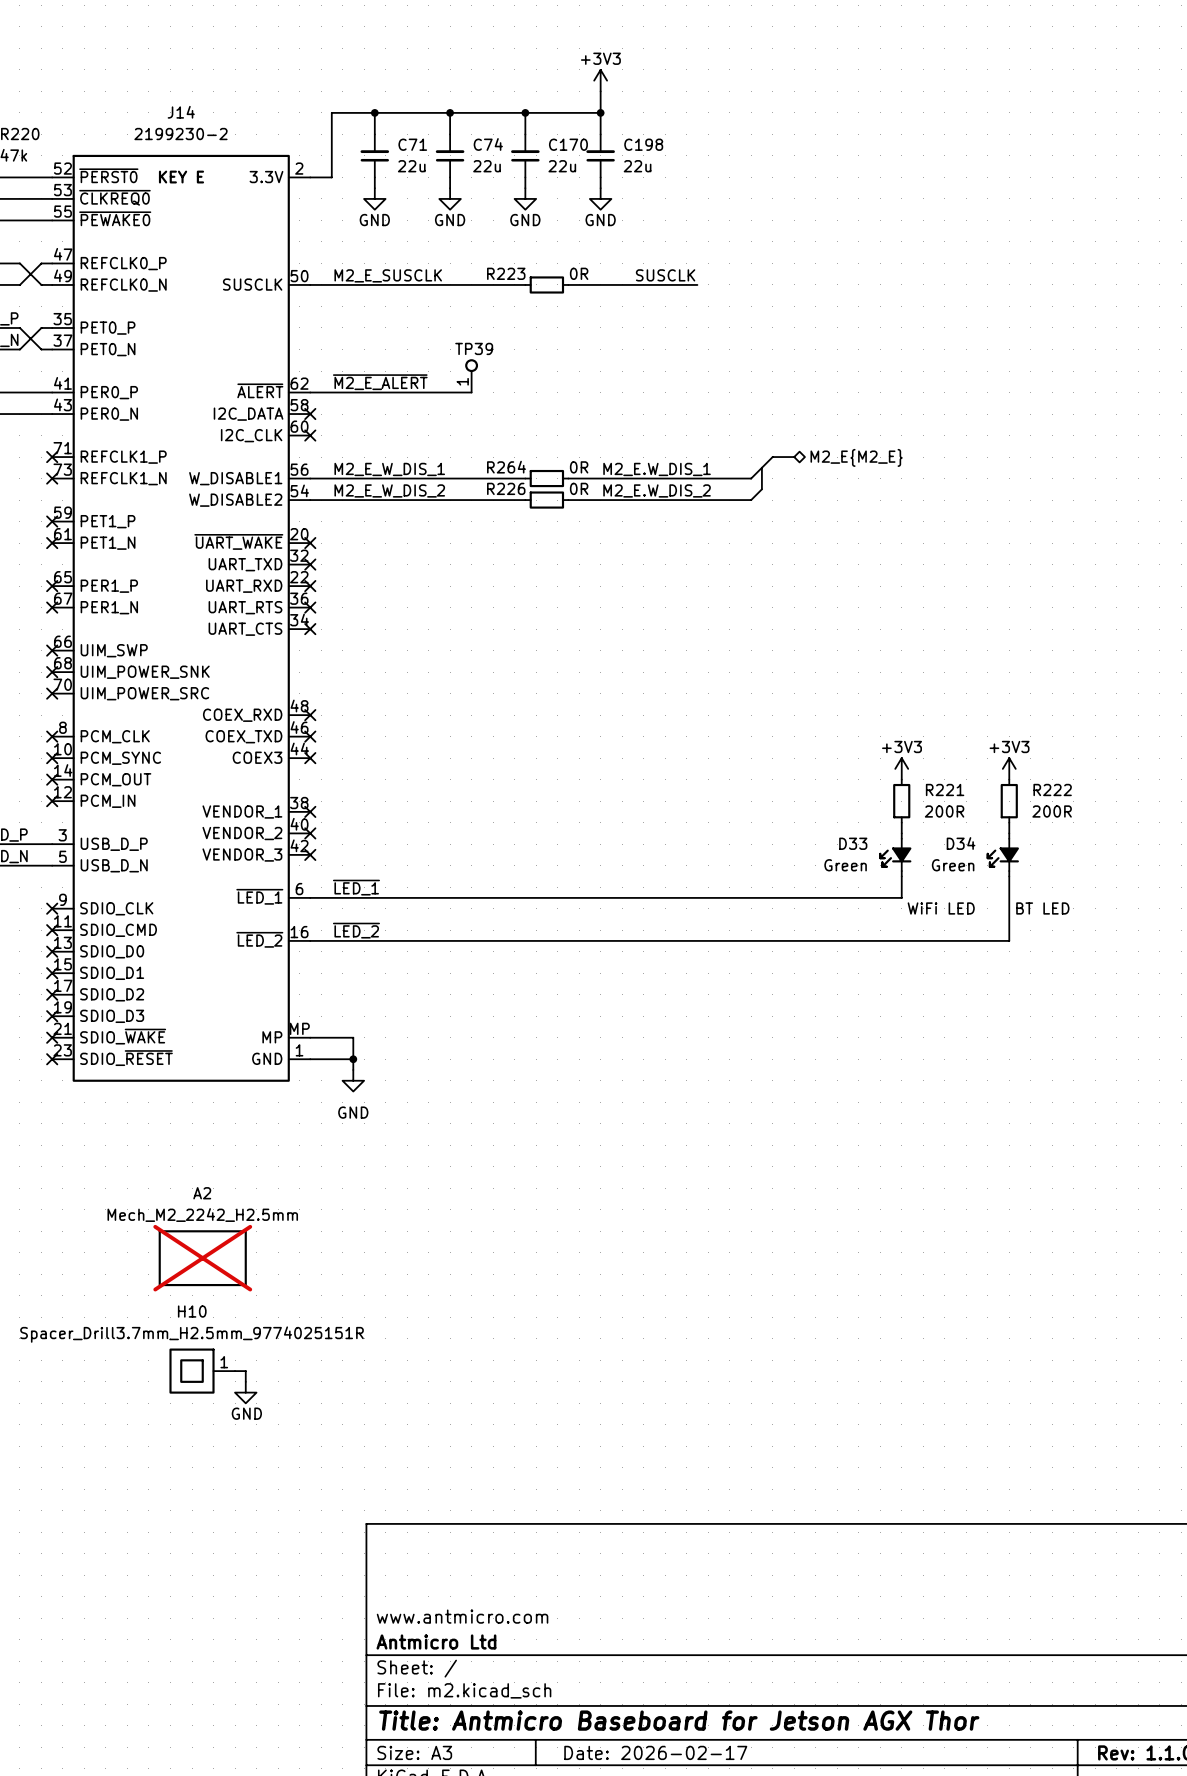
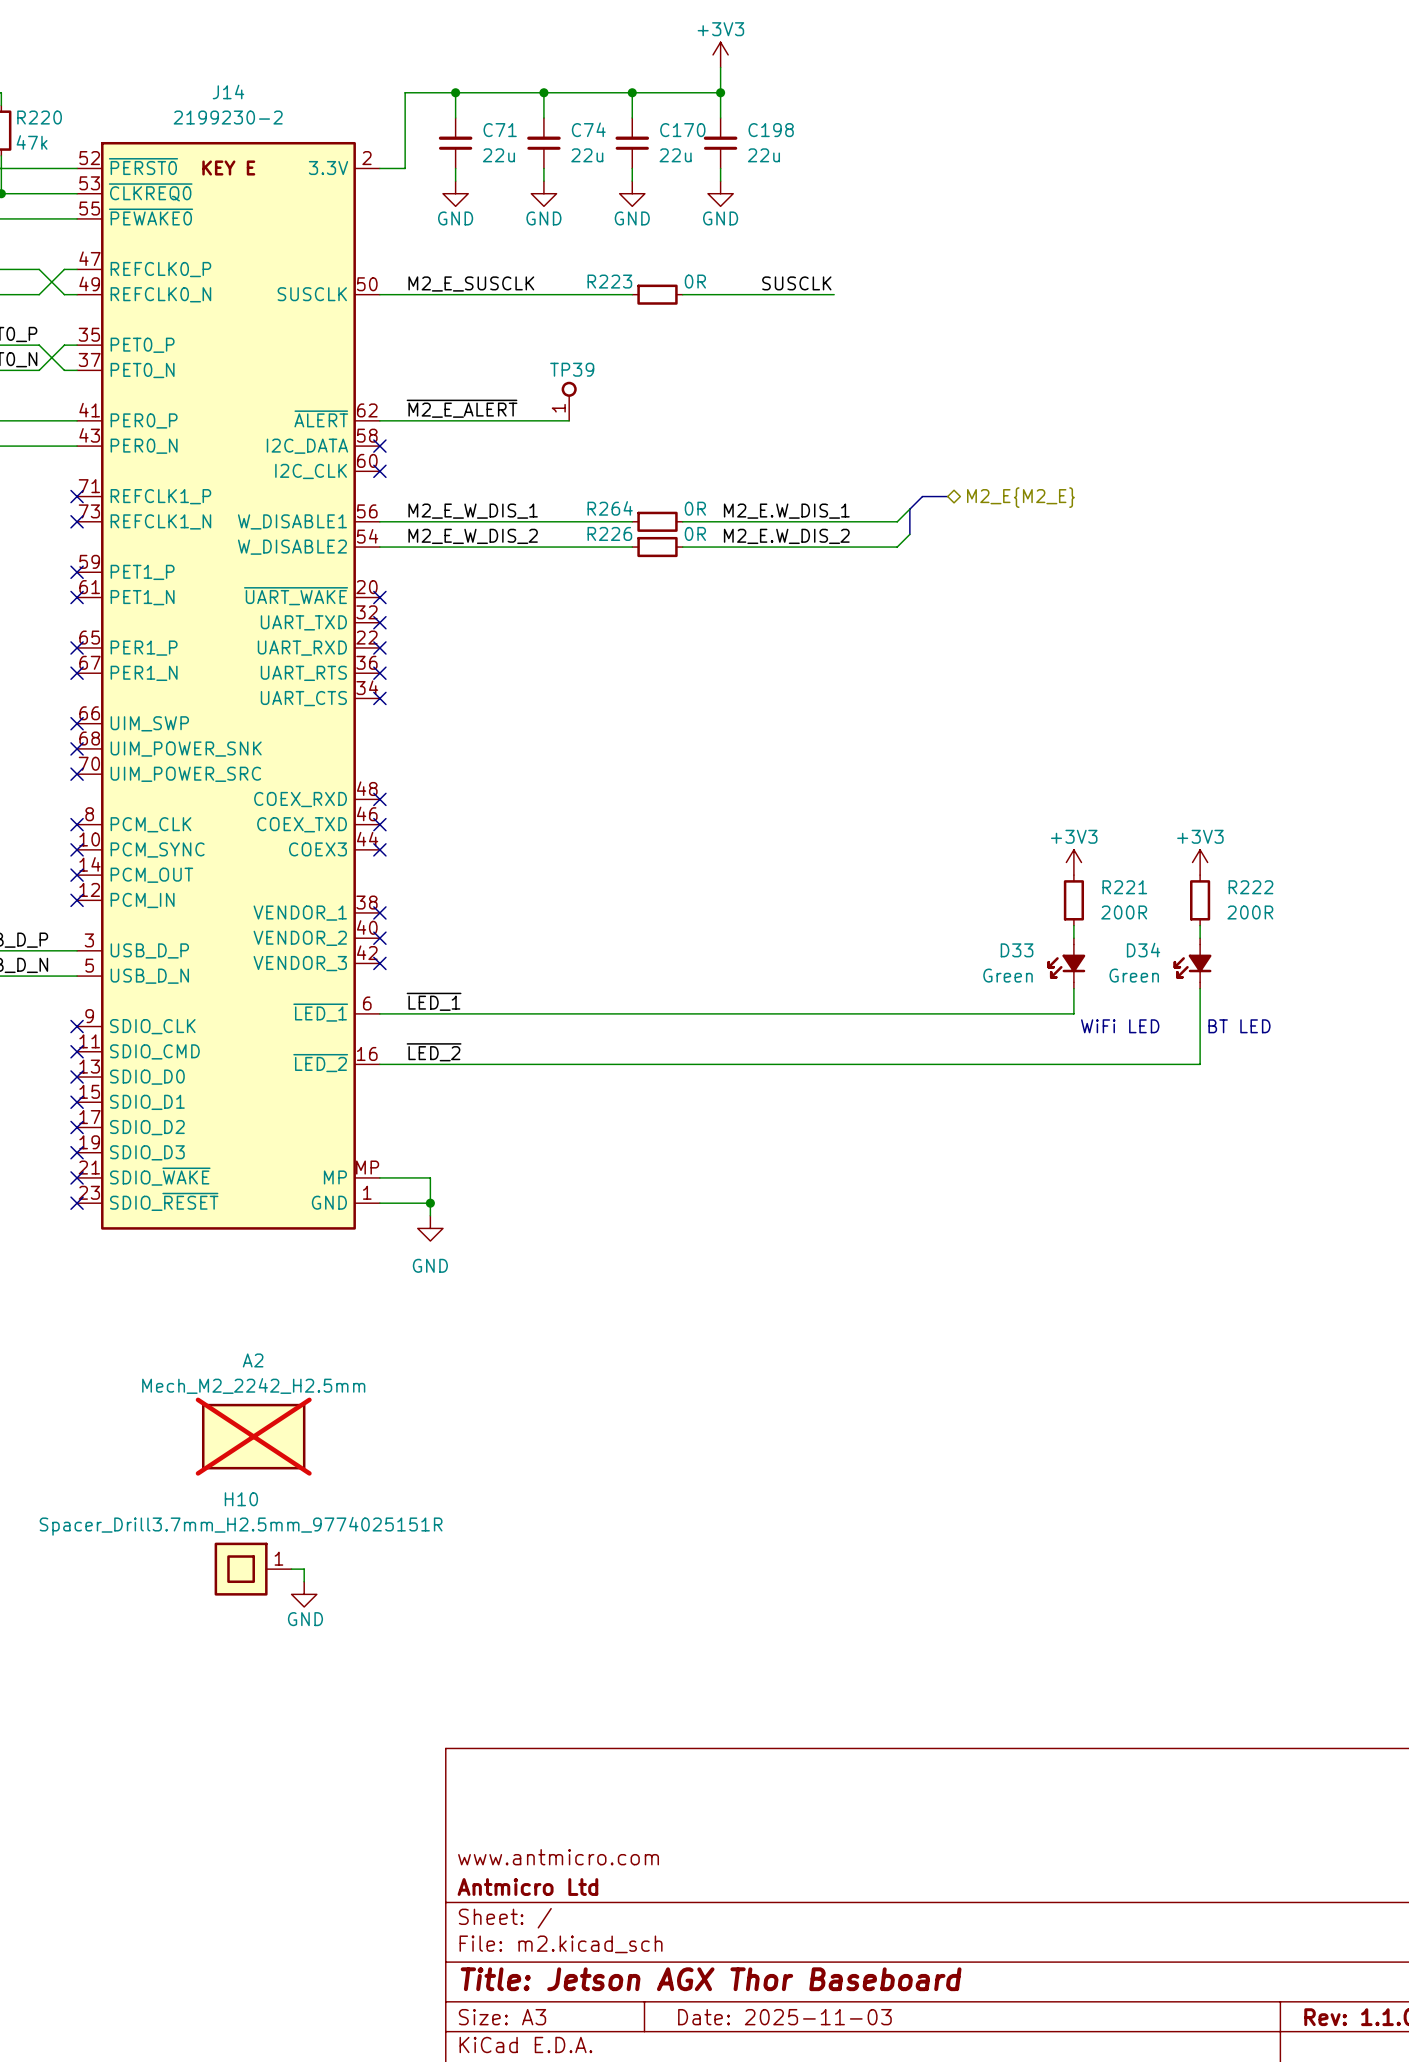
title block: Title: Antmicro Baseboard for Jetson AGX Thor (679, 1720) -> Title: Jetson AGX Thor Baseboard (711, 1979)
title block: Date: 2026-02-17 (655, 1752) -> Date: 2025-11-03 (784, 2017)

